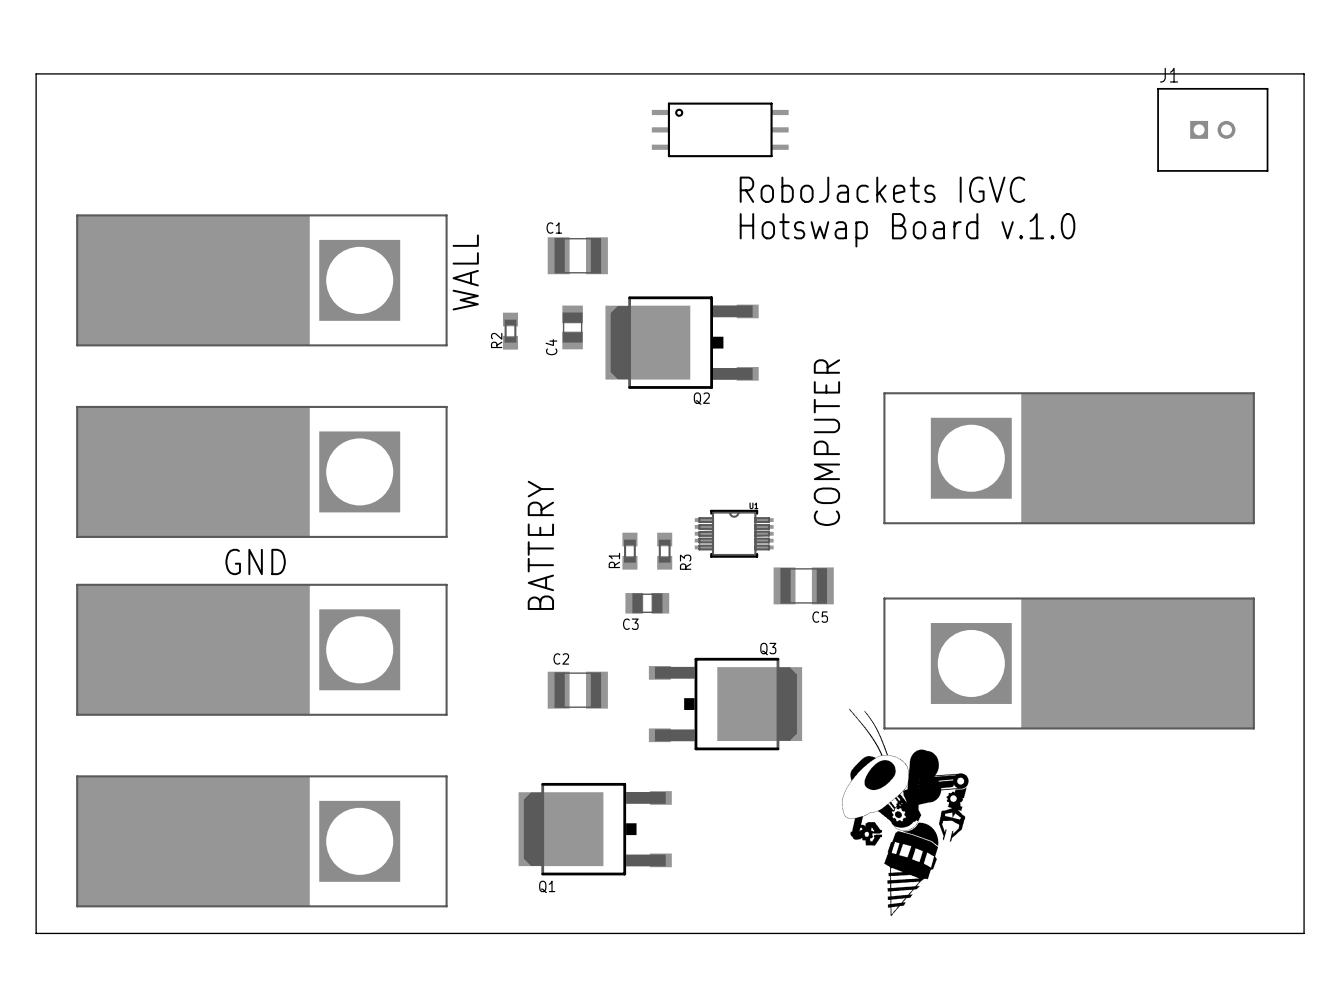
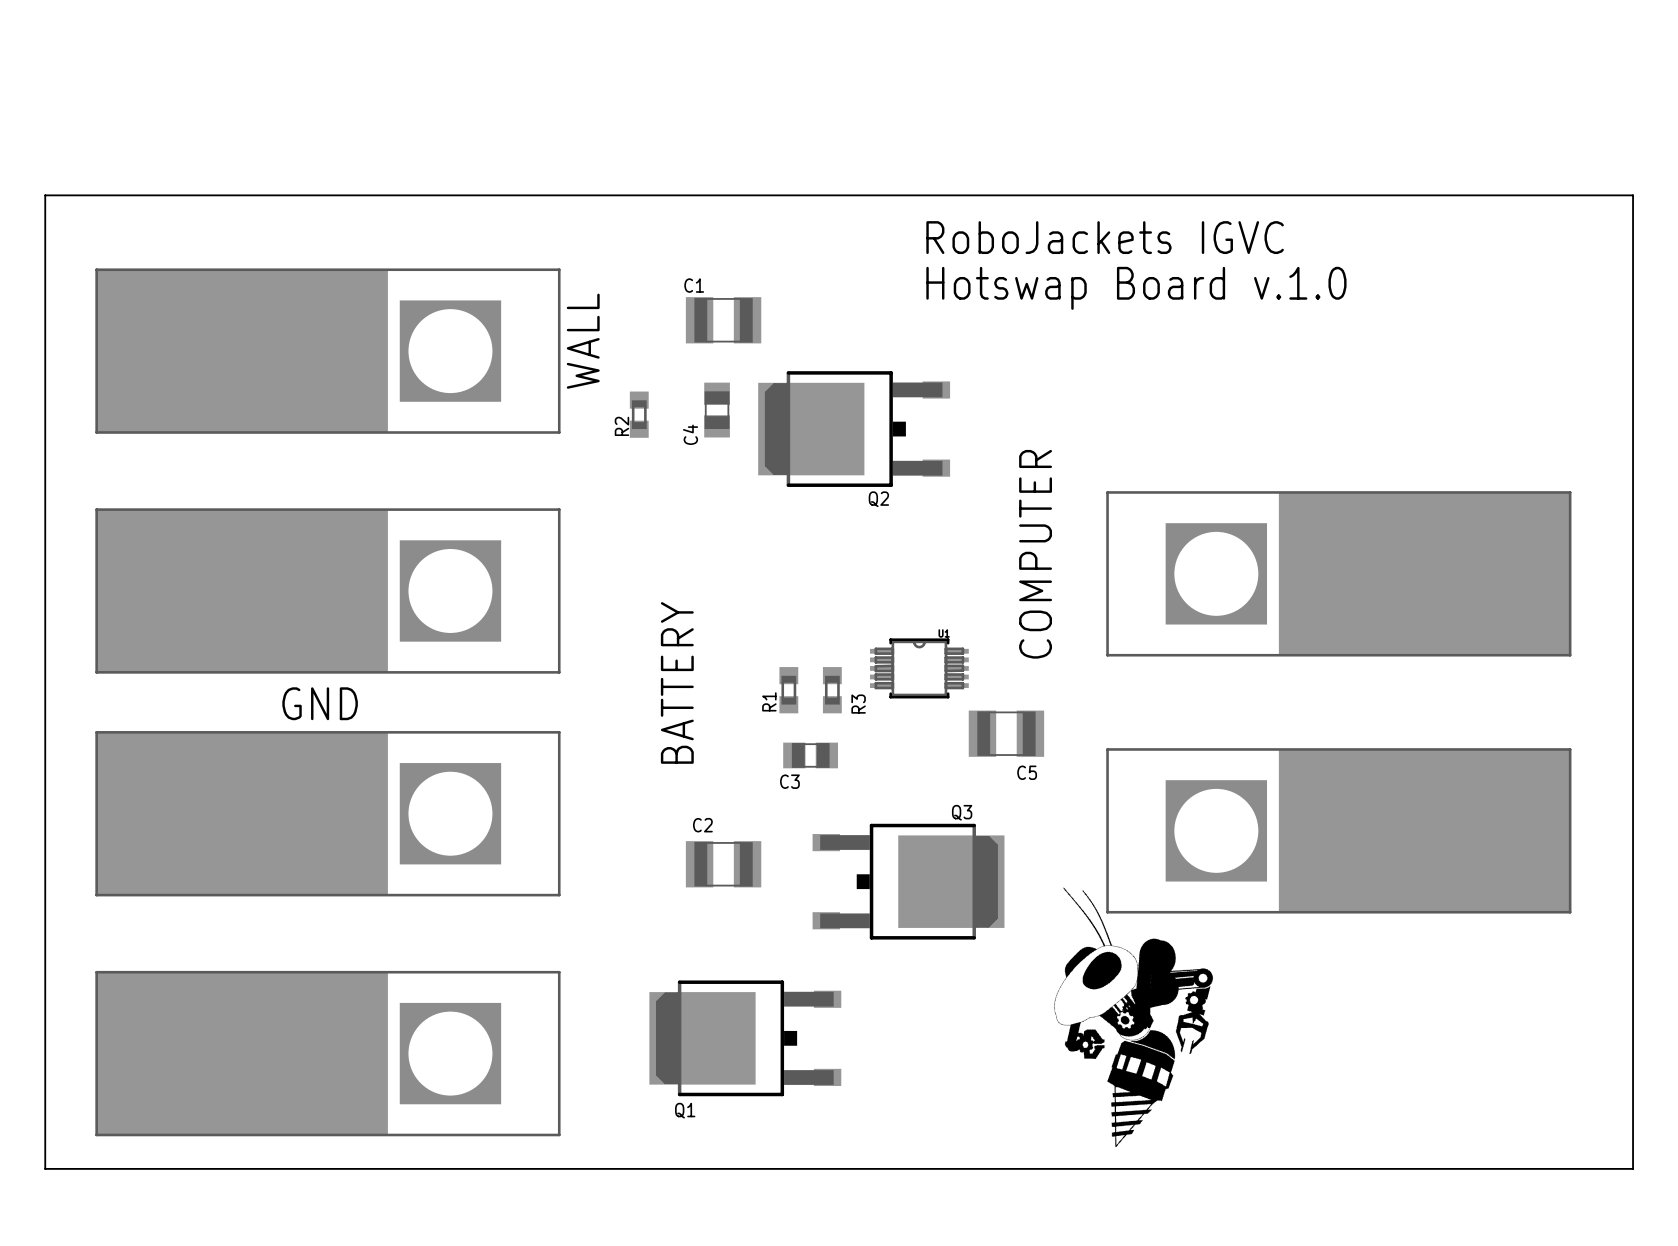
part: (720, 129) -> none
J1: (1212, 129) -> none
board edge: (36, 156) (36, 73) (1304, 73) (1304, 156) -> (45, 195) (1633, 195)

